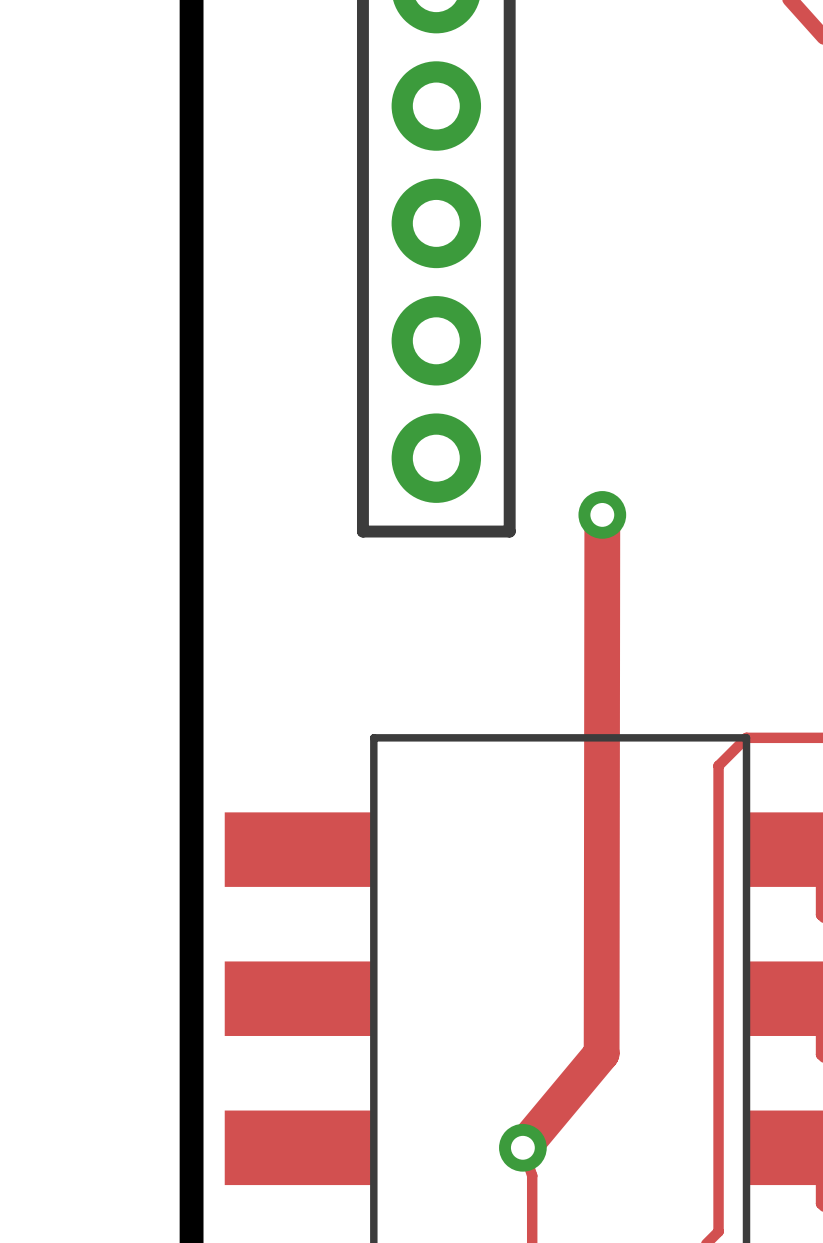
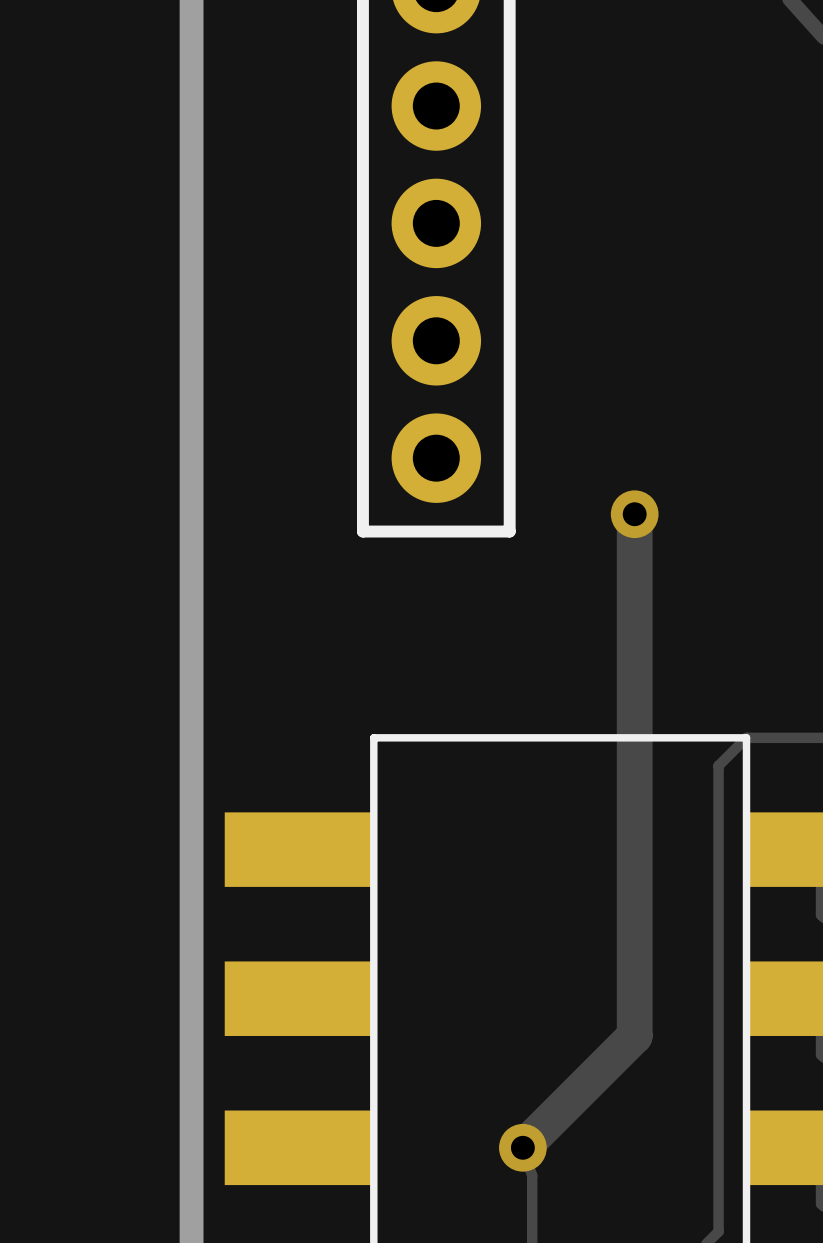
track: (602, 514) (601, 1053) (522, 1147) -> (634, 514) (634, 1035) (522, 1147)
via position: (602, 514) -> (634, 514)

